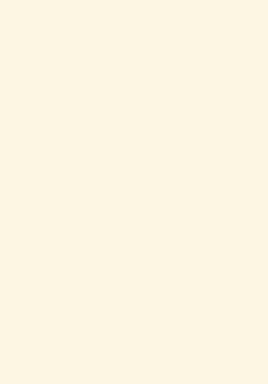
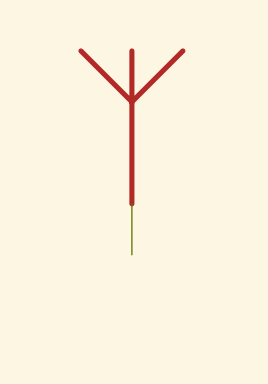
part: none -> (131, 127)
wire: none -> (131, 203) (131, 254)

